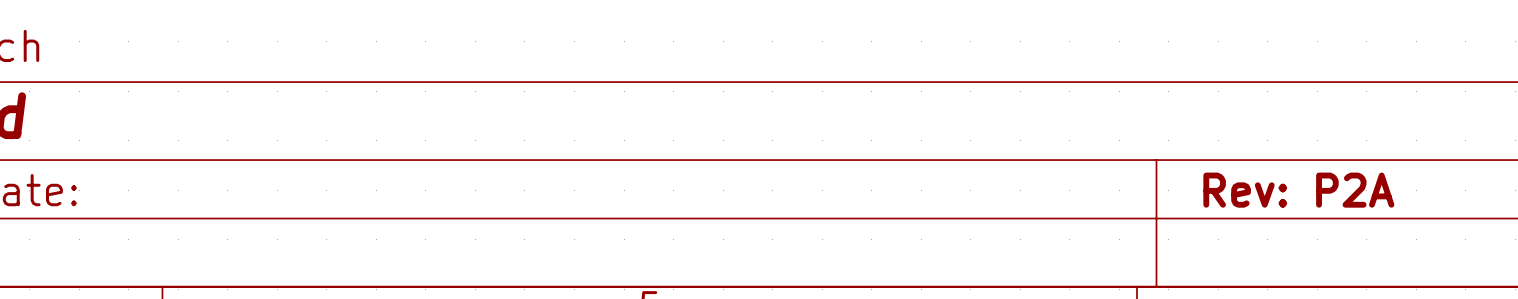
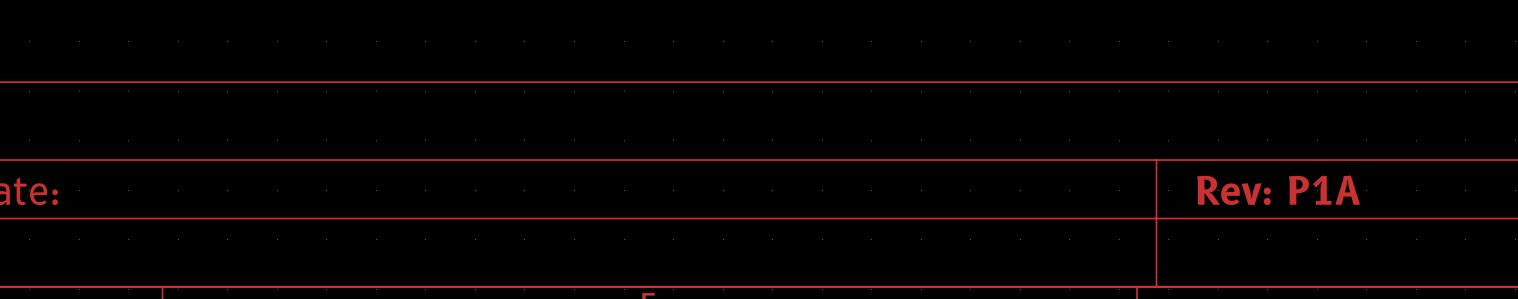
title block: Rev: P2A (1298, 190) -> Rev: P1A (1278, 190)

